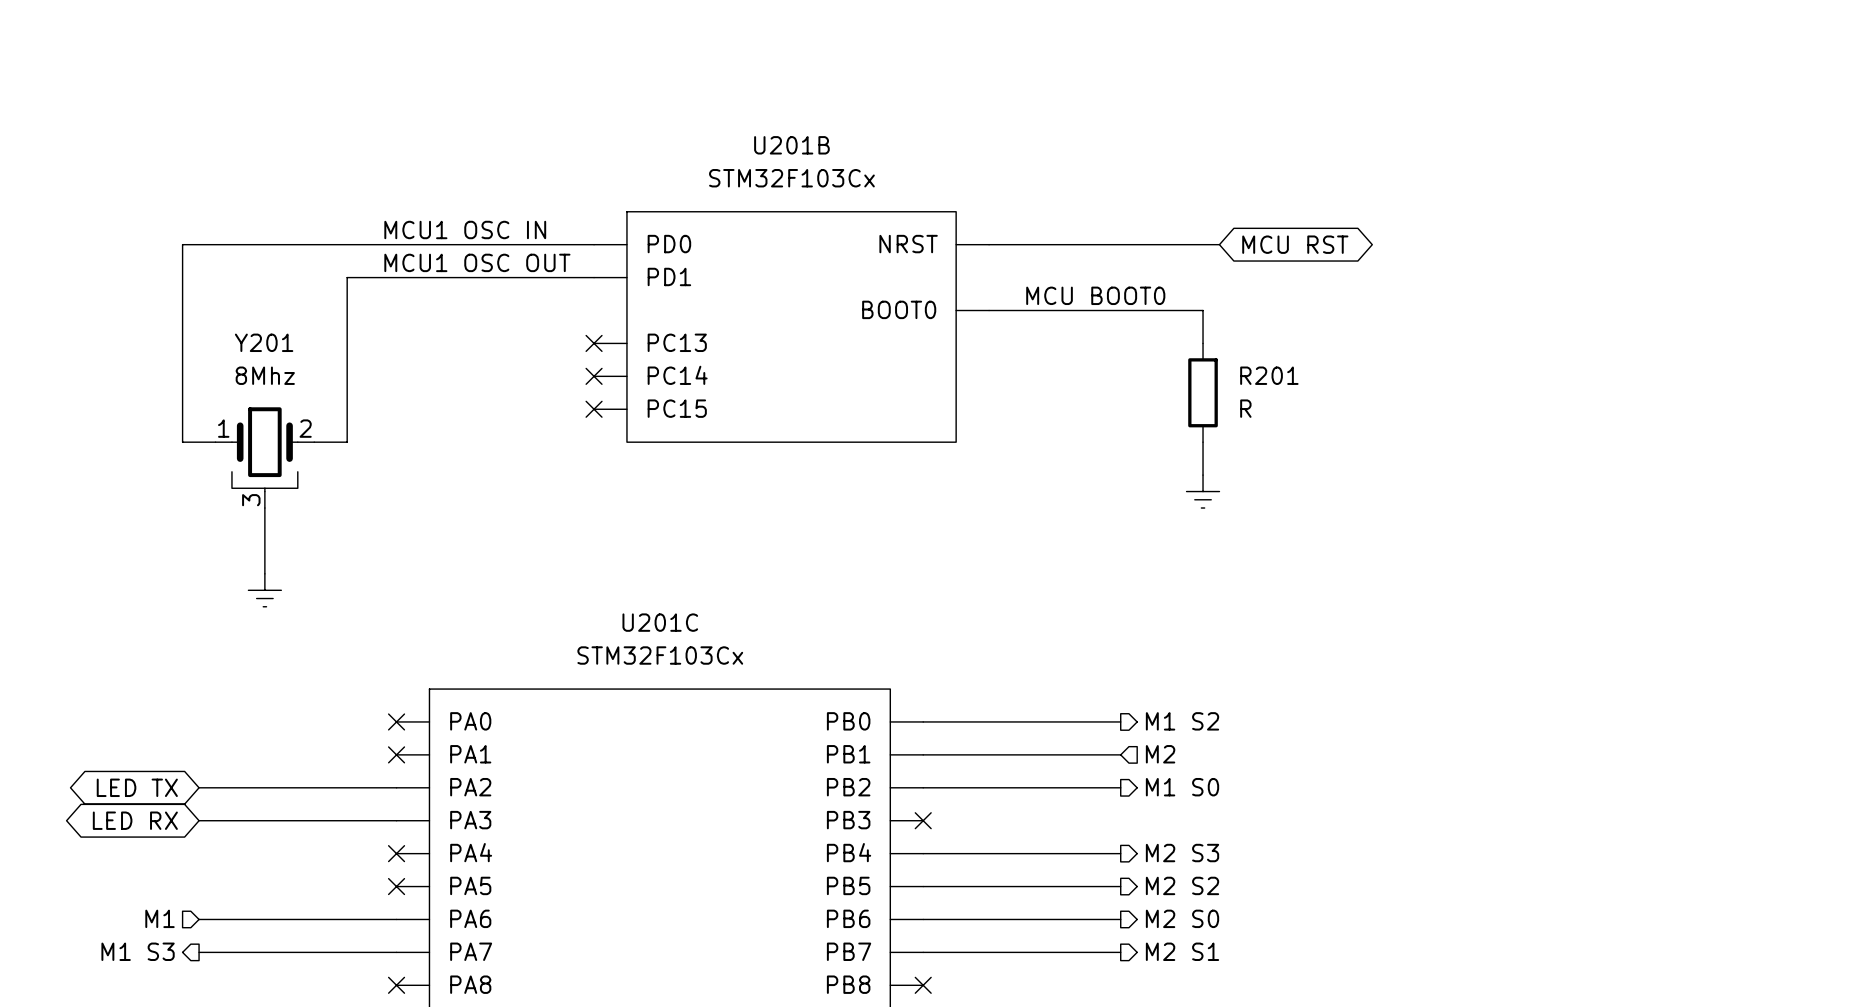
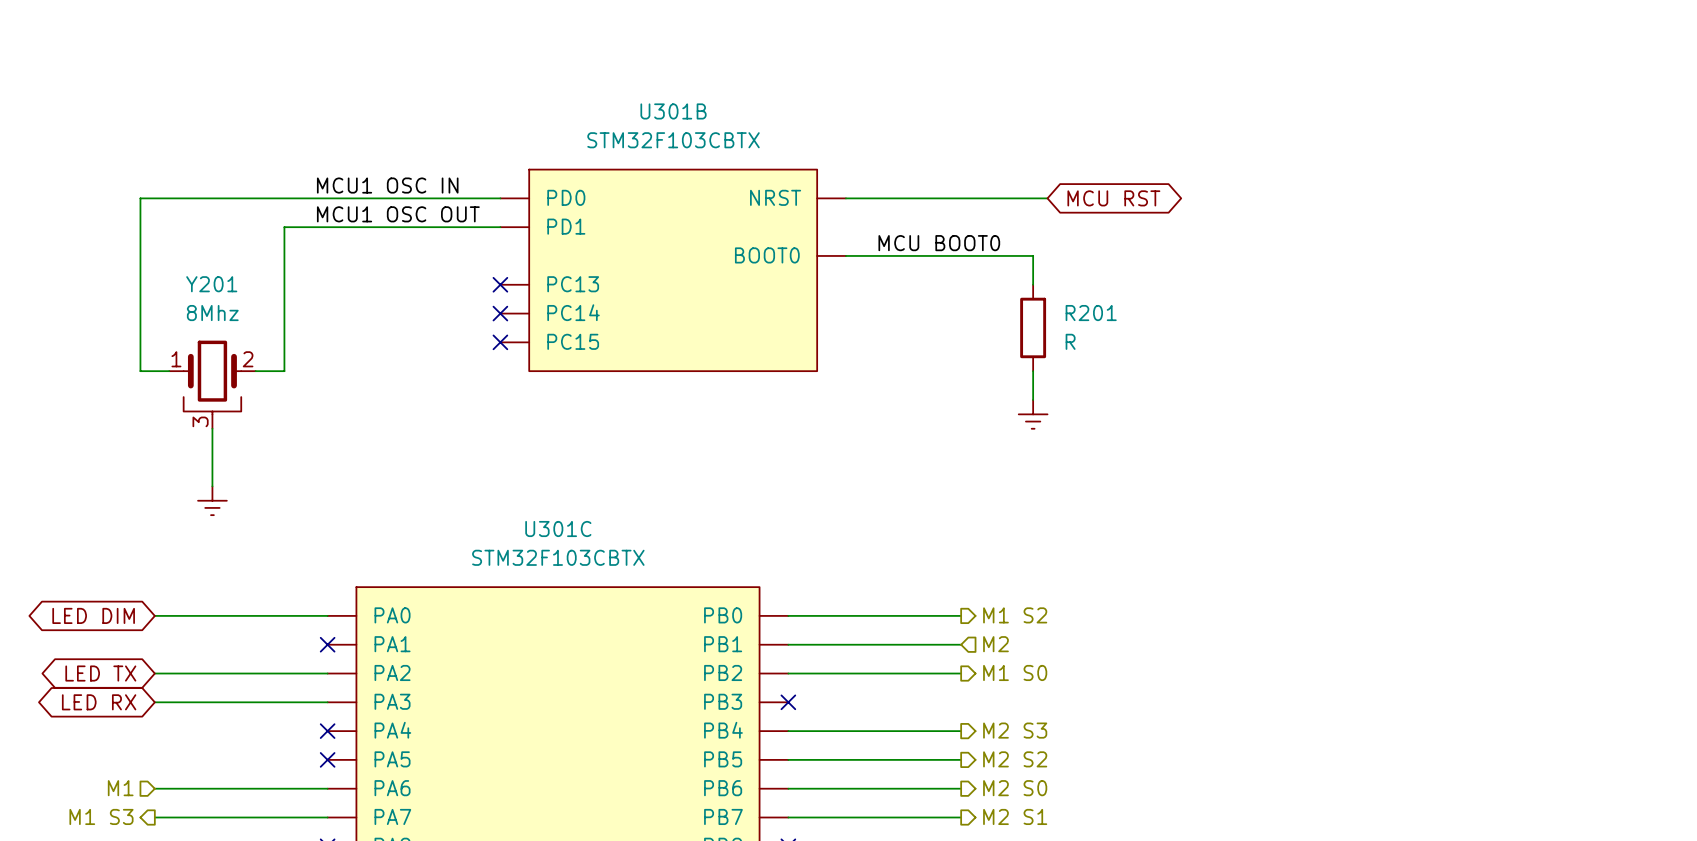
U201B name: U201B (791, 145) -> U301B (673, 111)
U201B value: STM32F103Cx (791, 178) -> STM32F103CBTX (673, 140)
U201C name: U201C (660, 622) -> U301C (558, 529)
U201C value: STM32F103Cx (660, 655) -> STM32F103CBTX (558, 557)
global label: none -> LED DIM (93, 615)
wire: none -> (154, 615) (327, 615)
no-connect mark: (396, 721) -> none

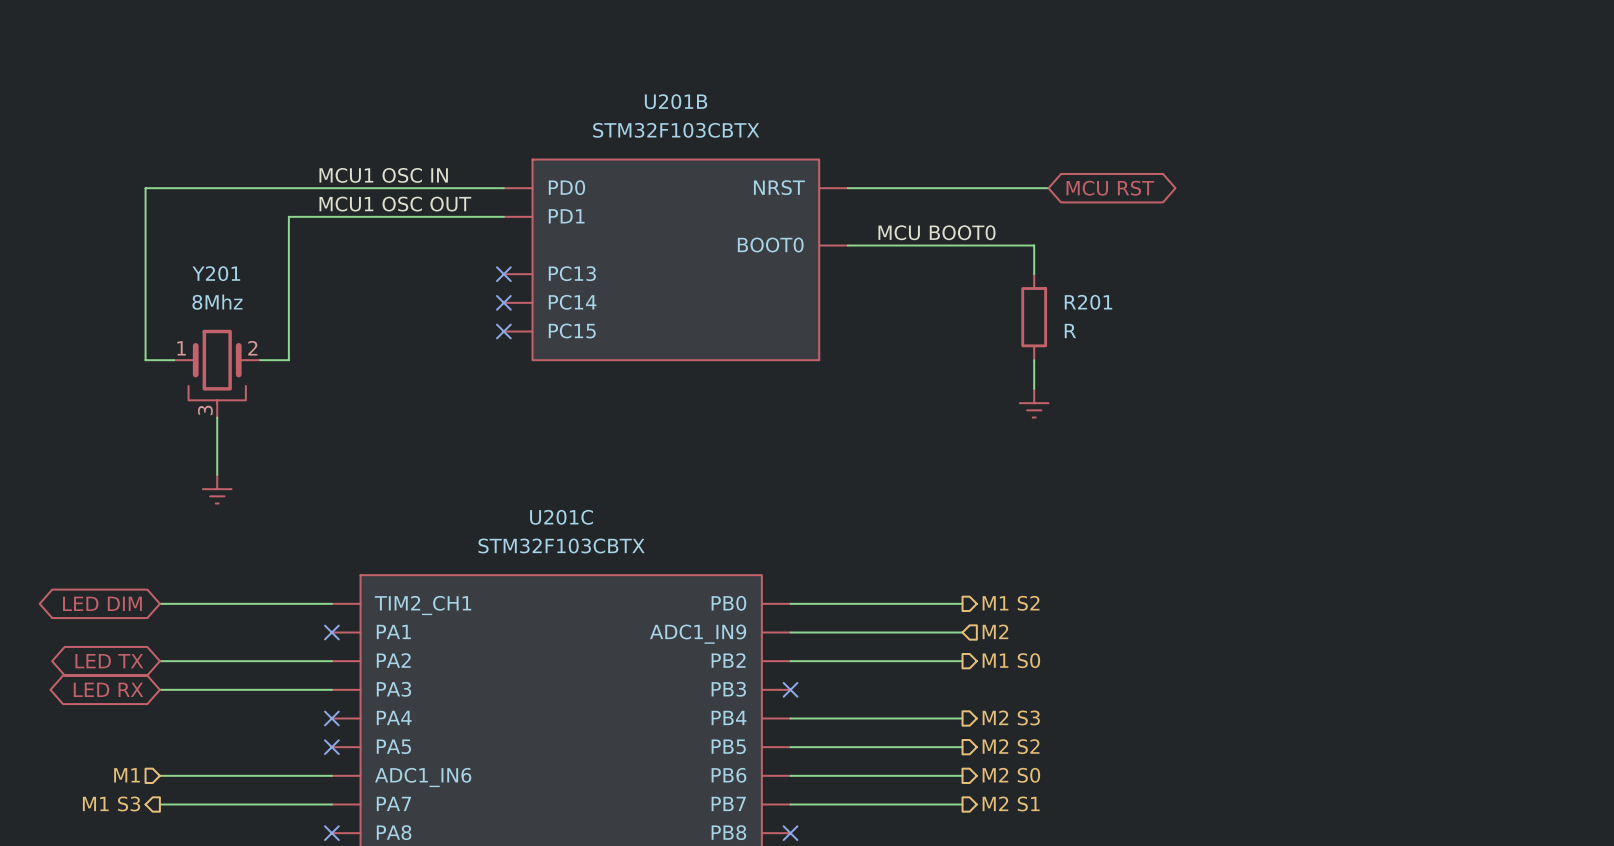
U301B name: U301B (673, 111) -> U201B (676, 101)
U301C name: U301C (558, 529) -> U201C (561, 517)
U301C pin name: PA0 (392, 615) -> TIM2_CH1 (423, 605)
U301C pin name: PB1 (723, 644) -> ADC1_IN9 (698, 634)
U301C pin name: PA6 (392, 788) -> ADC1_IN6 (423, 777)

